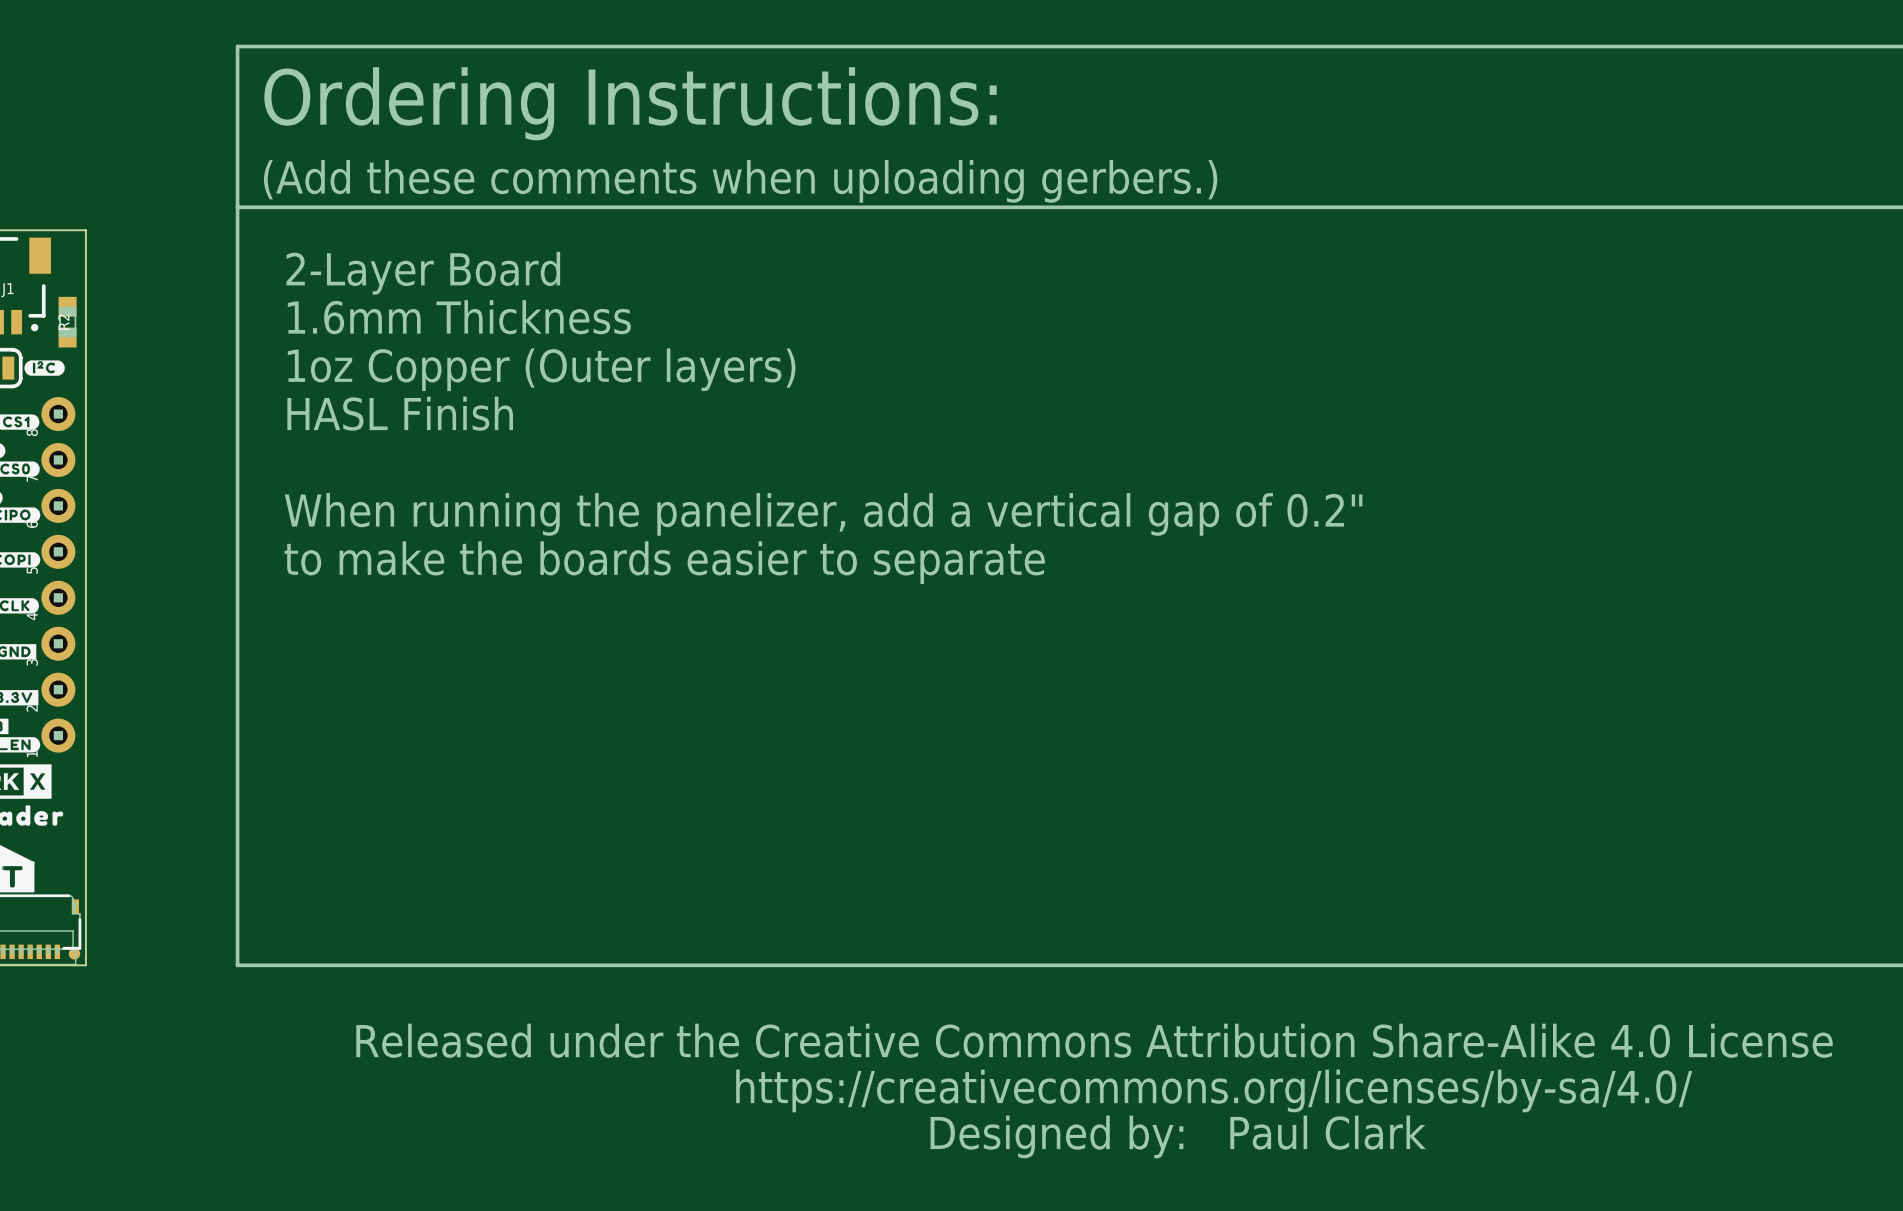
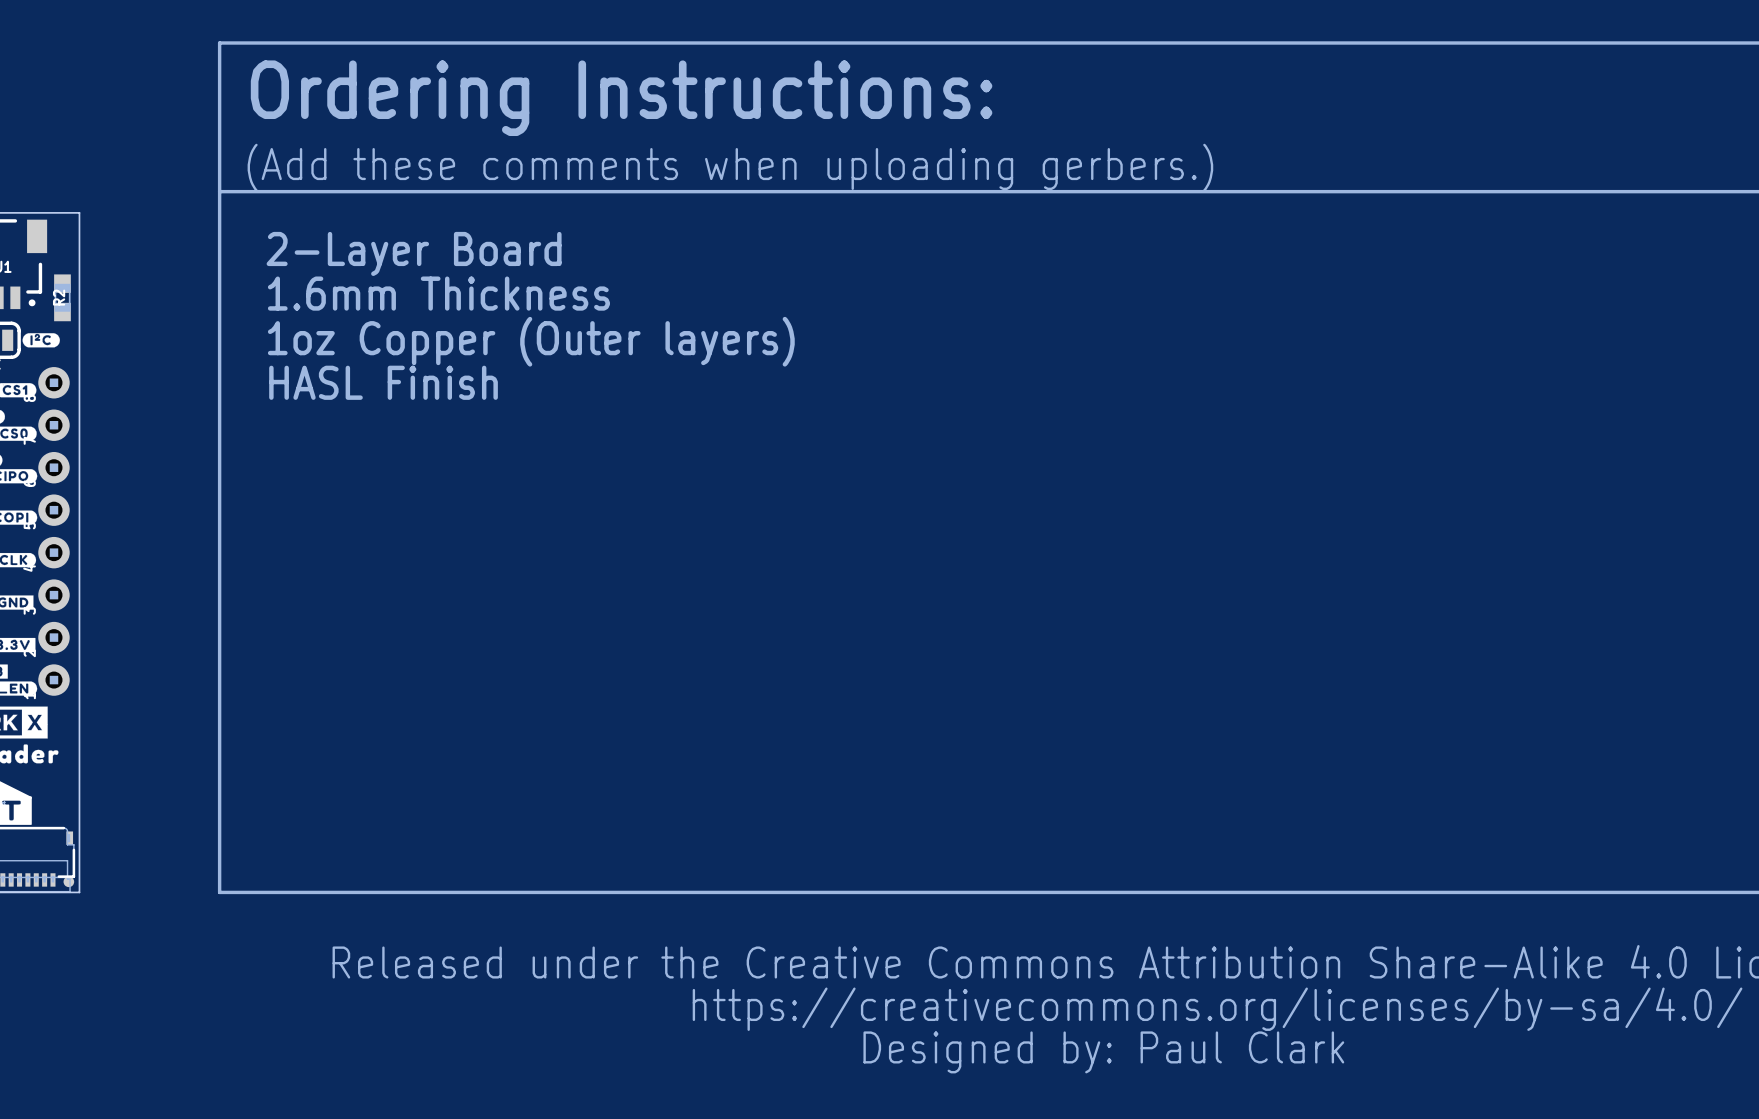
text: When running the panelizer, add a vertical gap of 0.2" (823, 514) -> none
text: to make the boards easier to separate (664, 562) -> none

